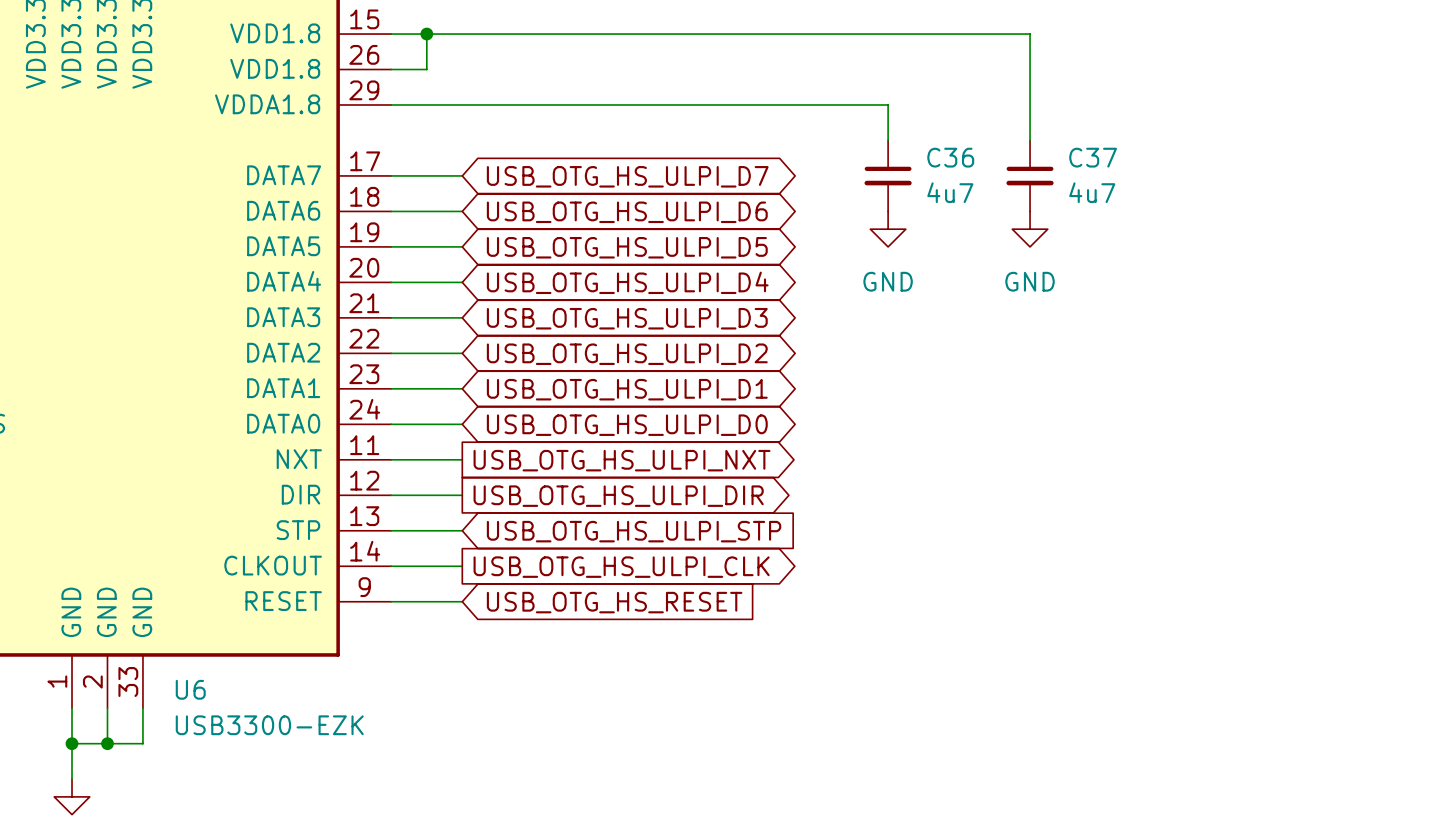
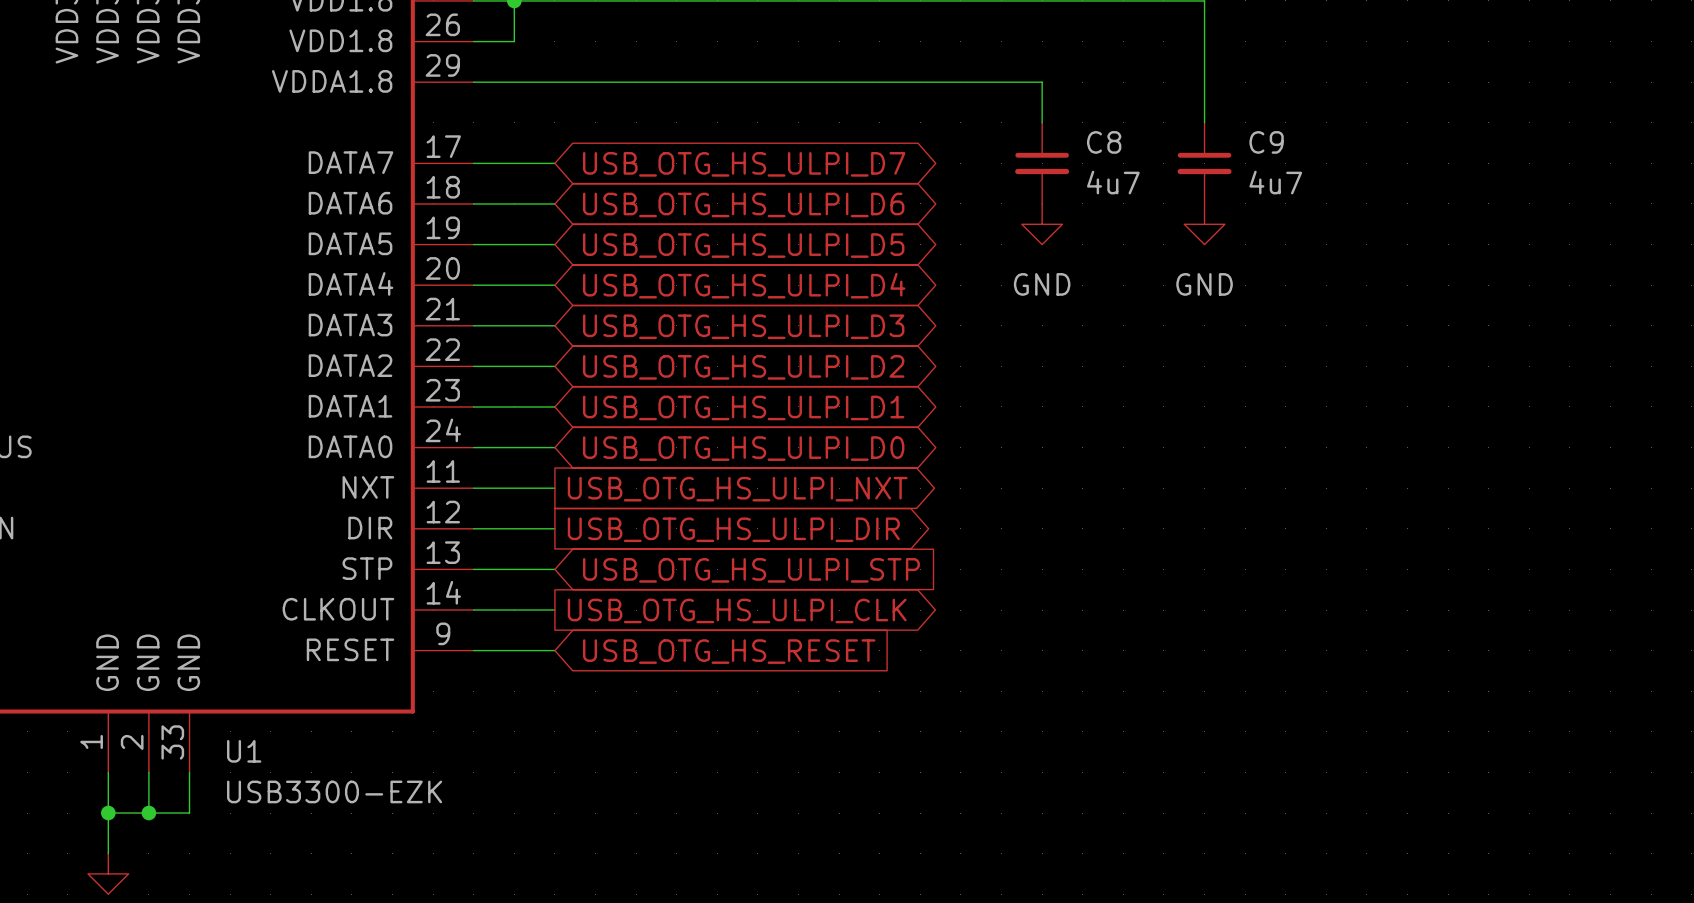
C36 name: C36 (950, 157) -> C8 (1104, 142)
C37 name: C37 (1093, 157) -> C9 (1266, 142)
U6 name: U6 (190, 689) -> U1 (244, 751)

